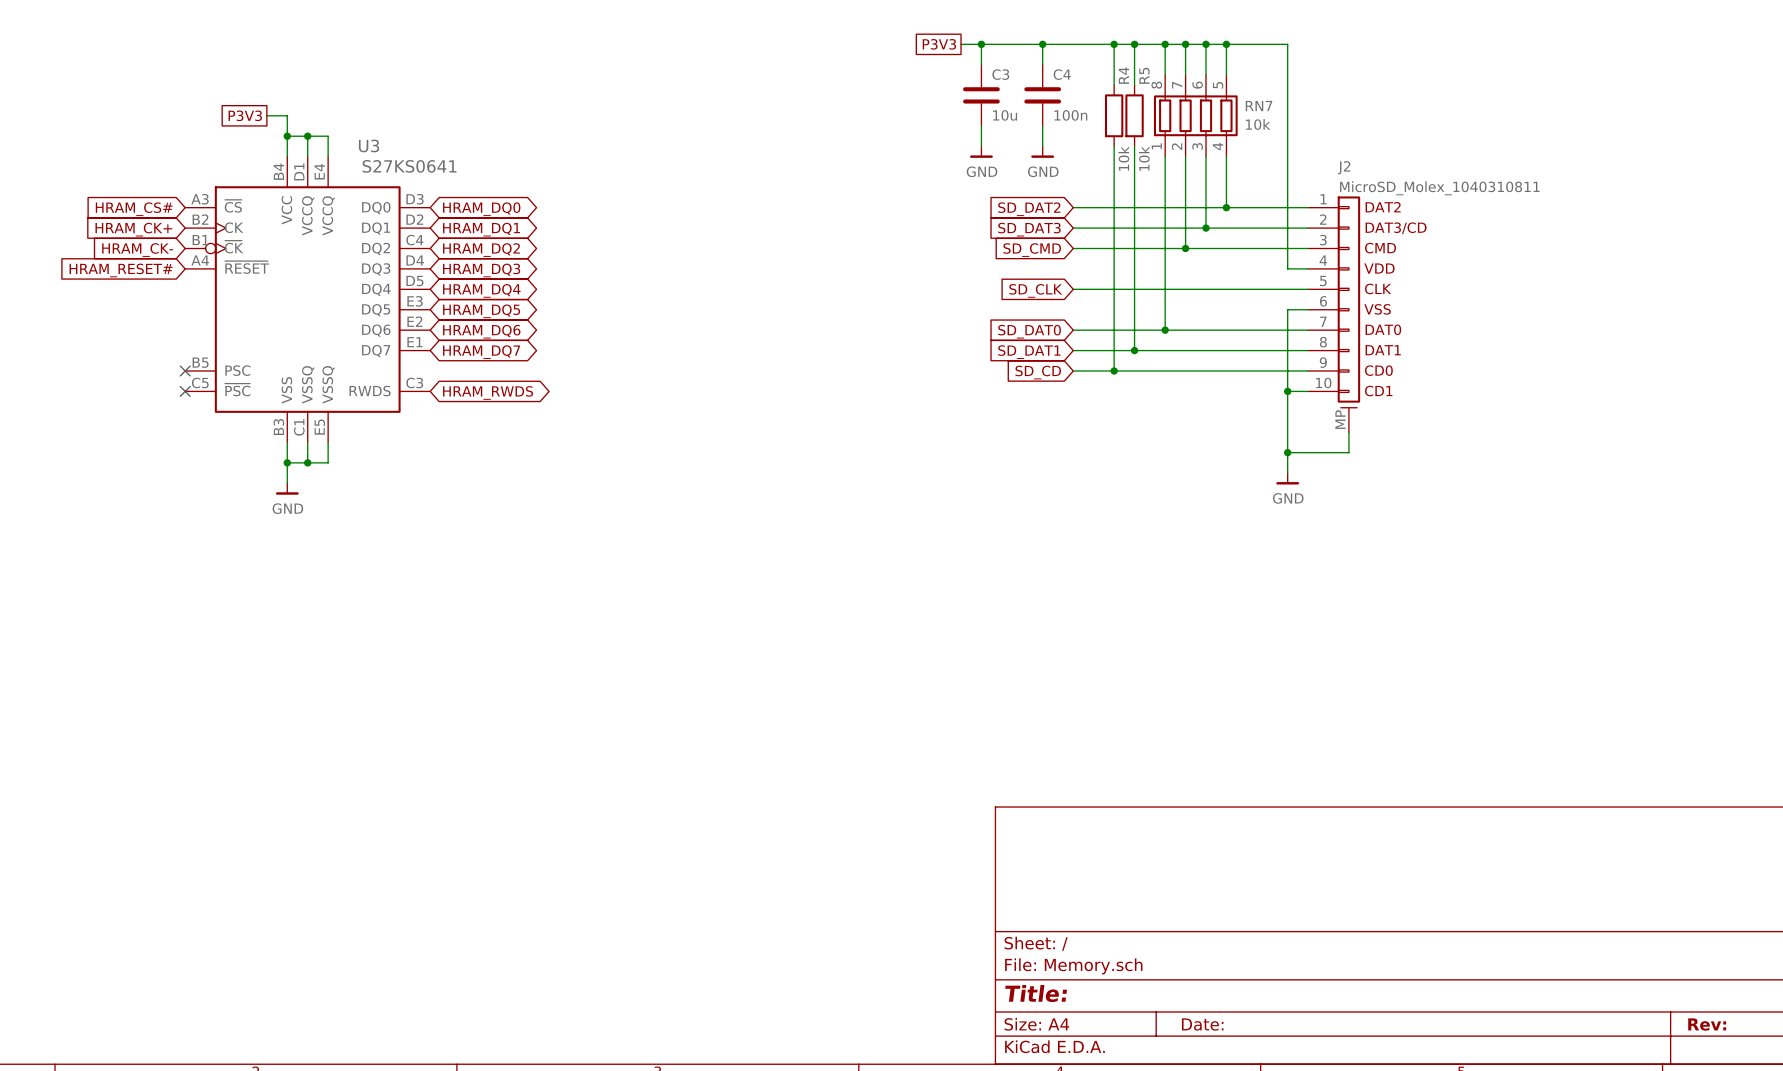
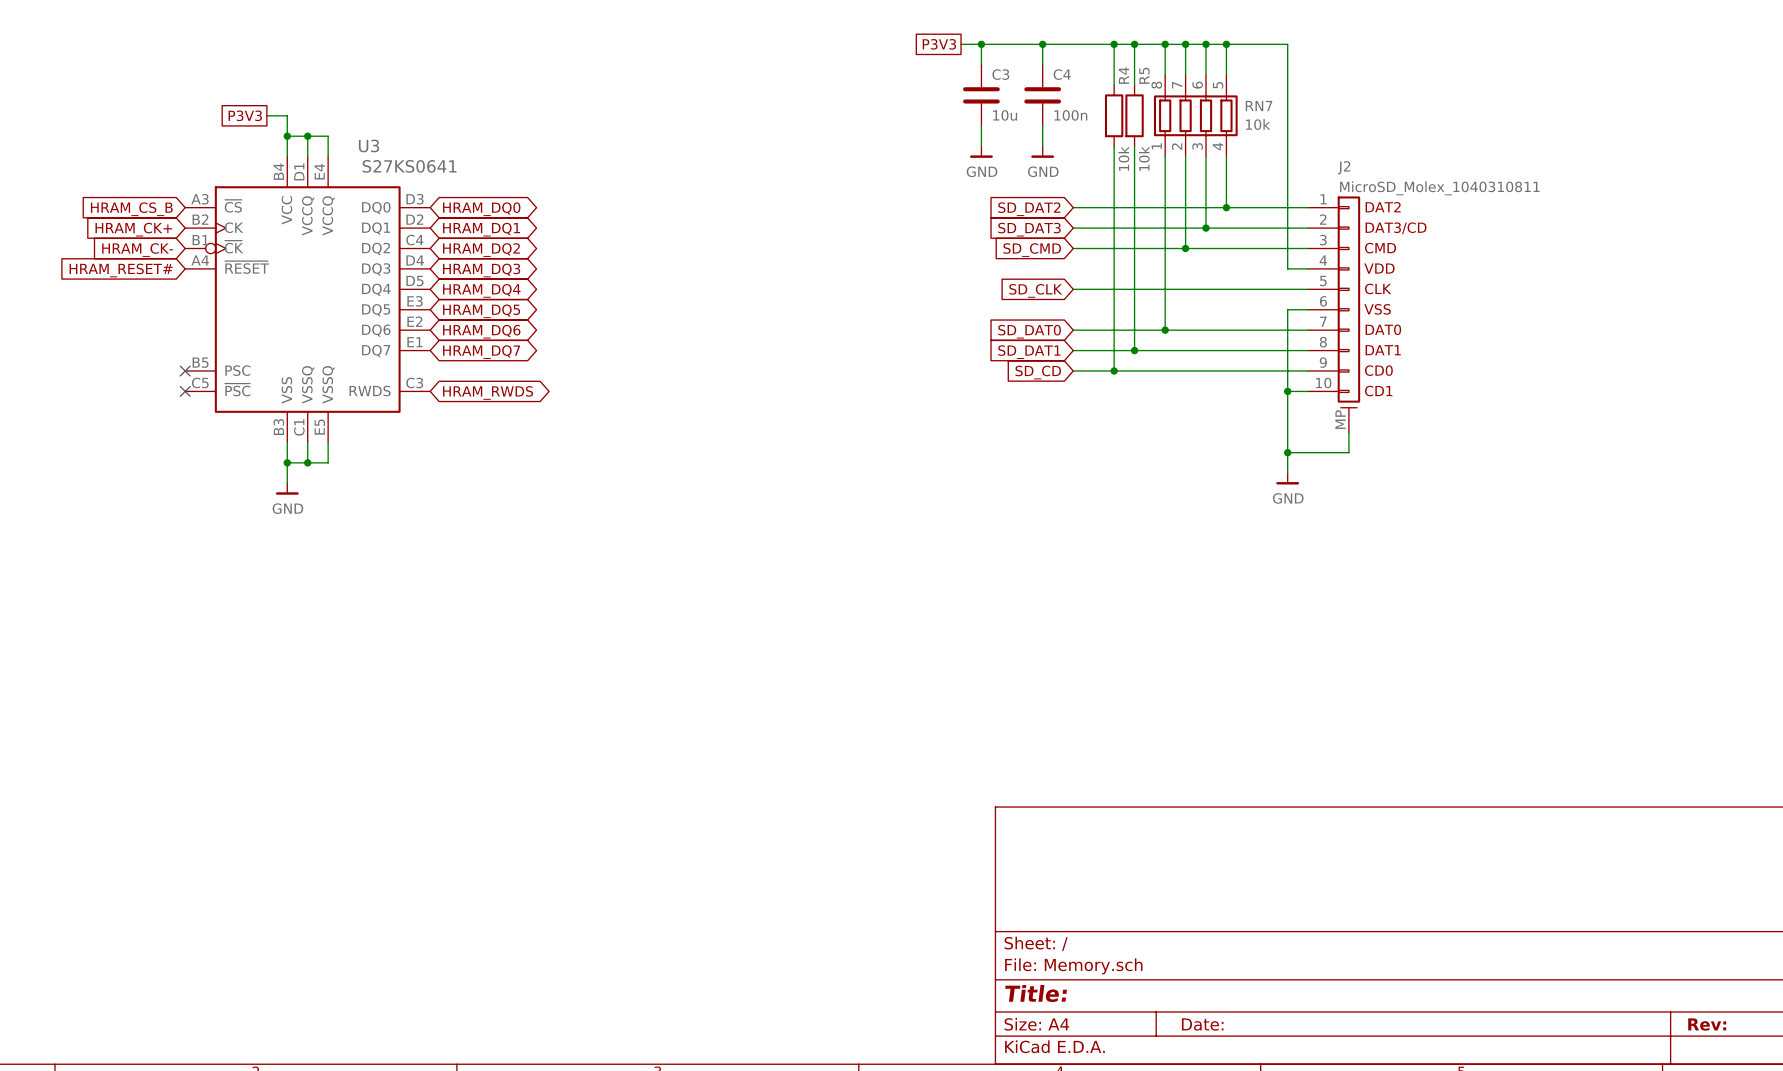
global label: HRAM_CS# (134, 209) -> HRAM_CS_B (131, 209)

